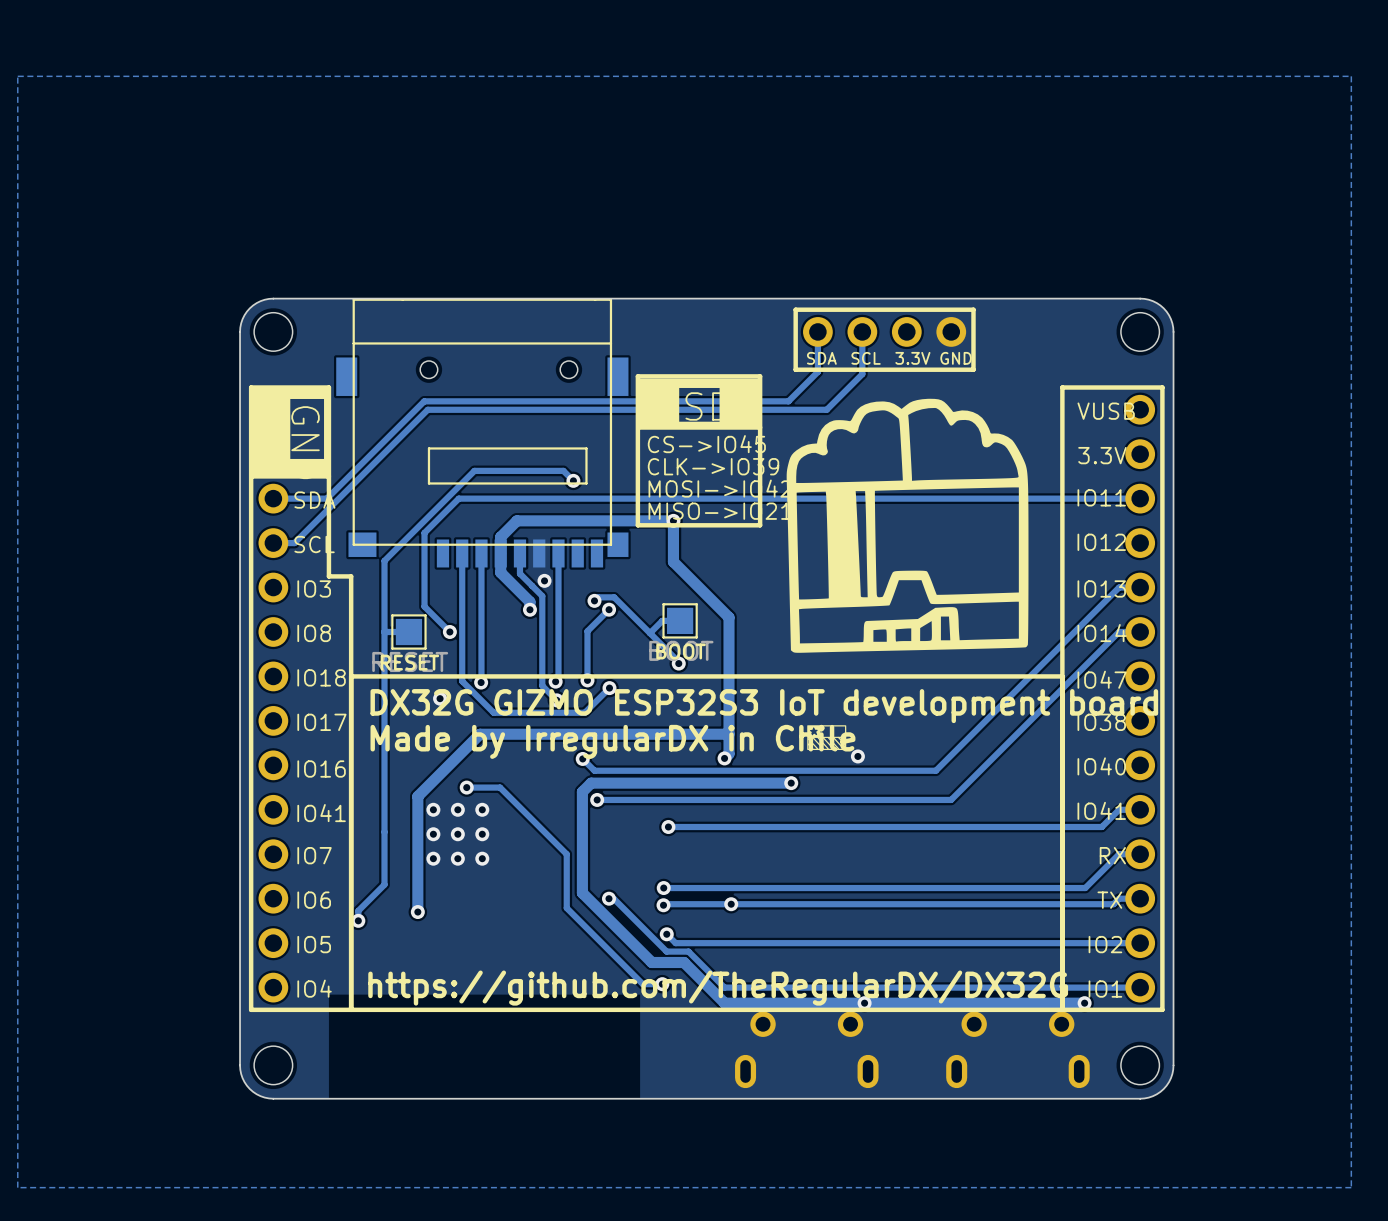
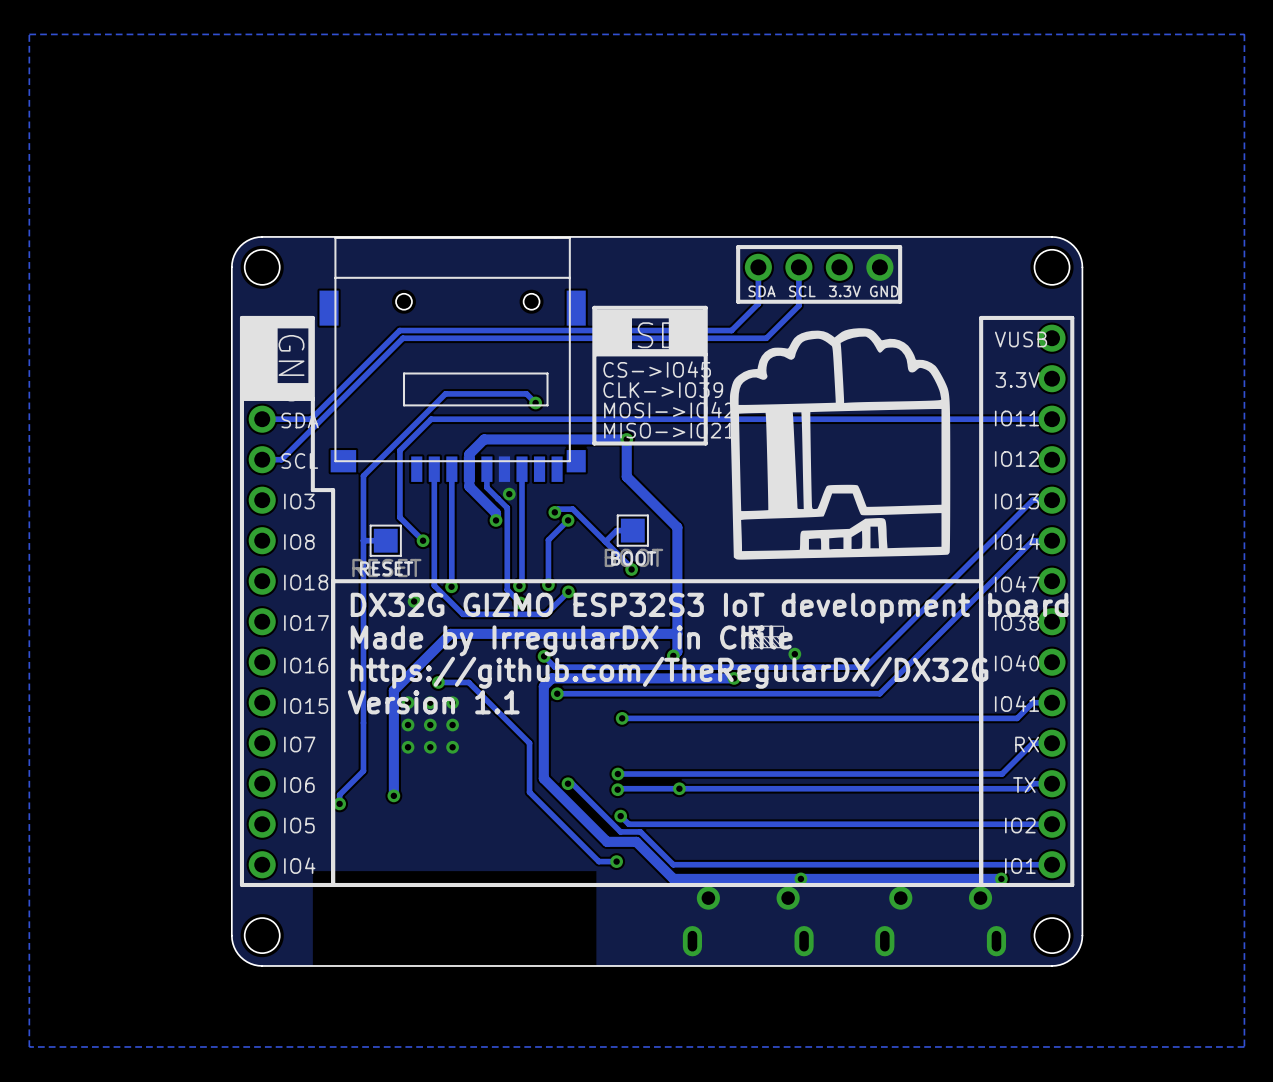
text: none -> Version 1.1 (433, 702)
text: IO41 (321, 813) -> IO15 (306, 706)
text position: https://github.com/TheRegularDX/DX32G (718, 988) -> https://github.com/TheRegularDX/DX32G (669, 672)

